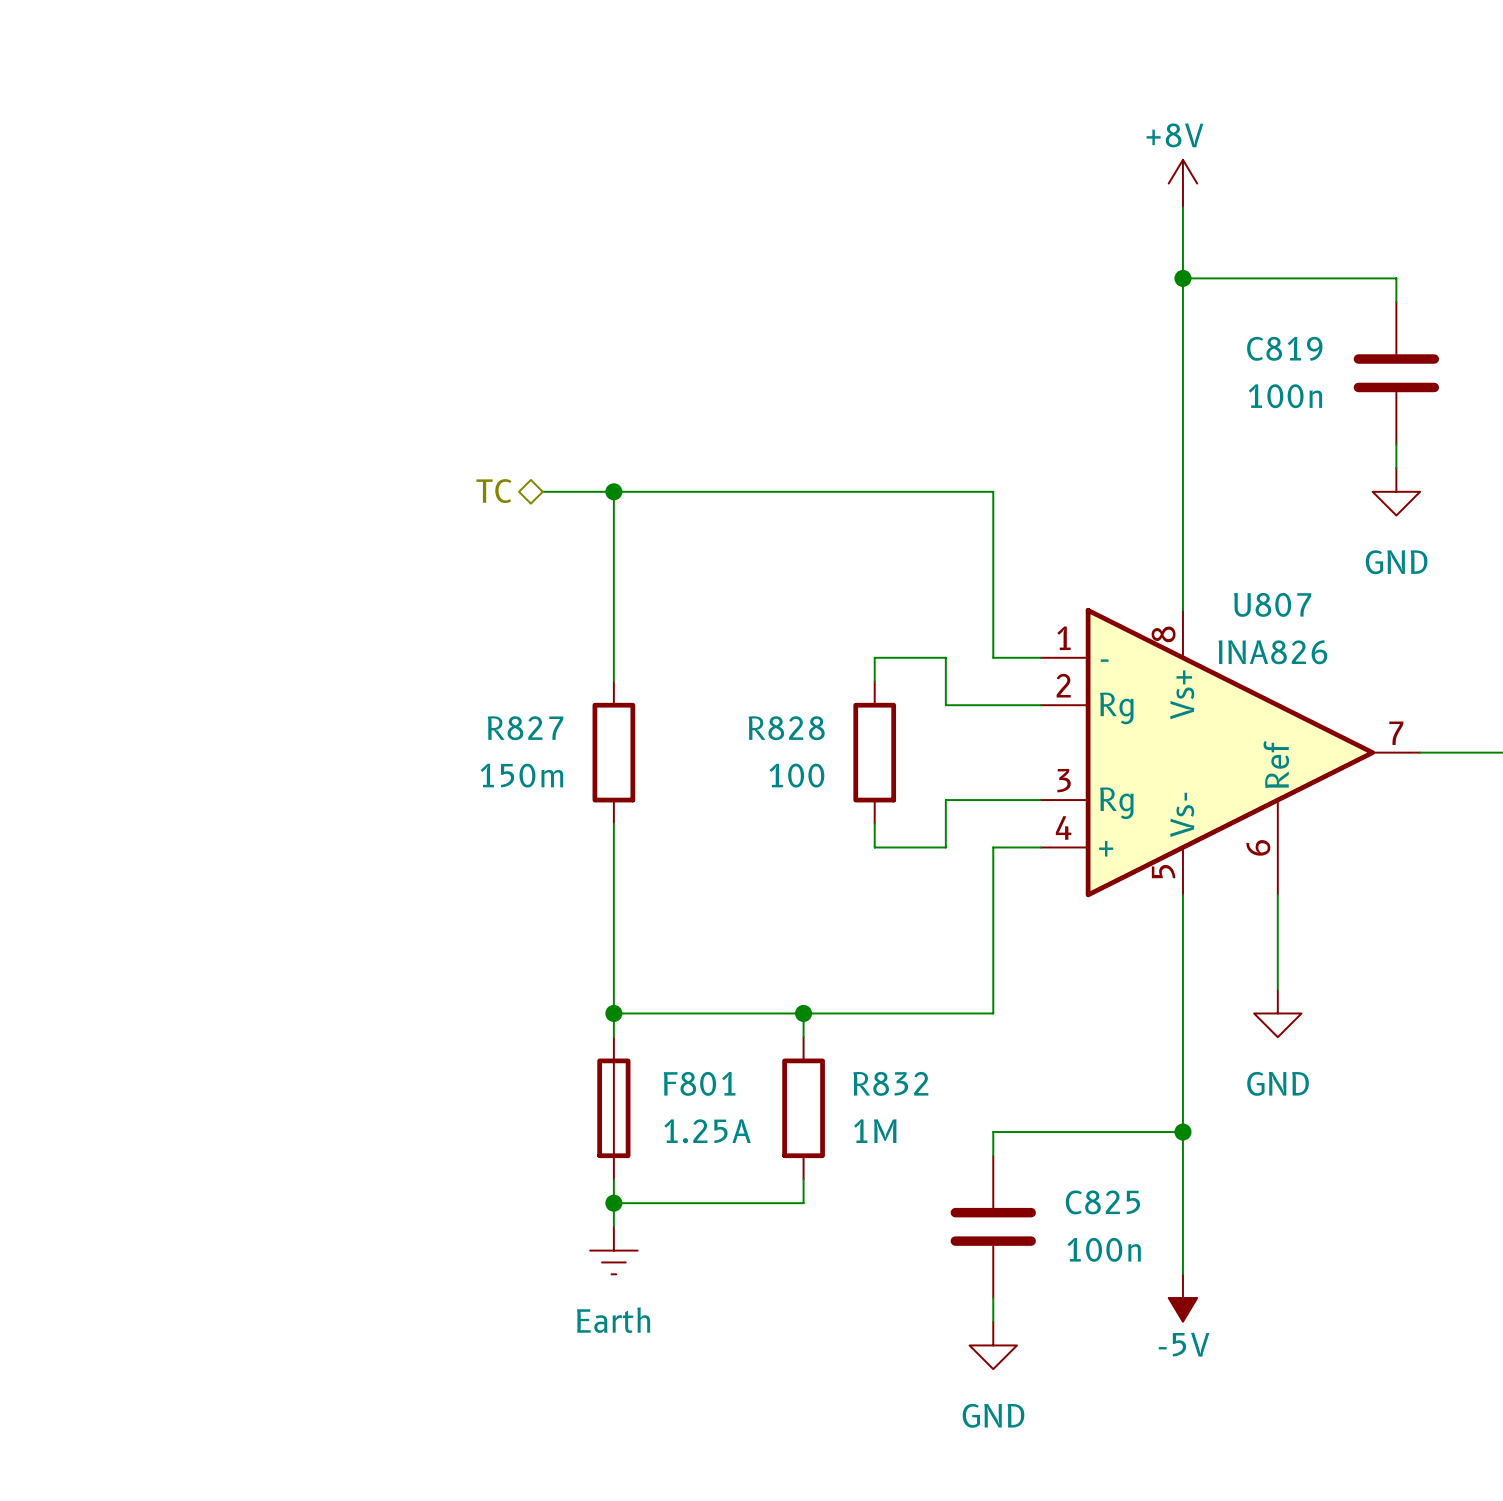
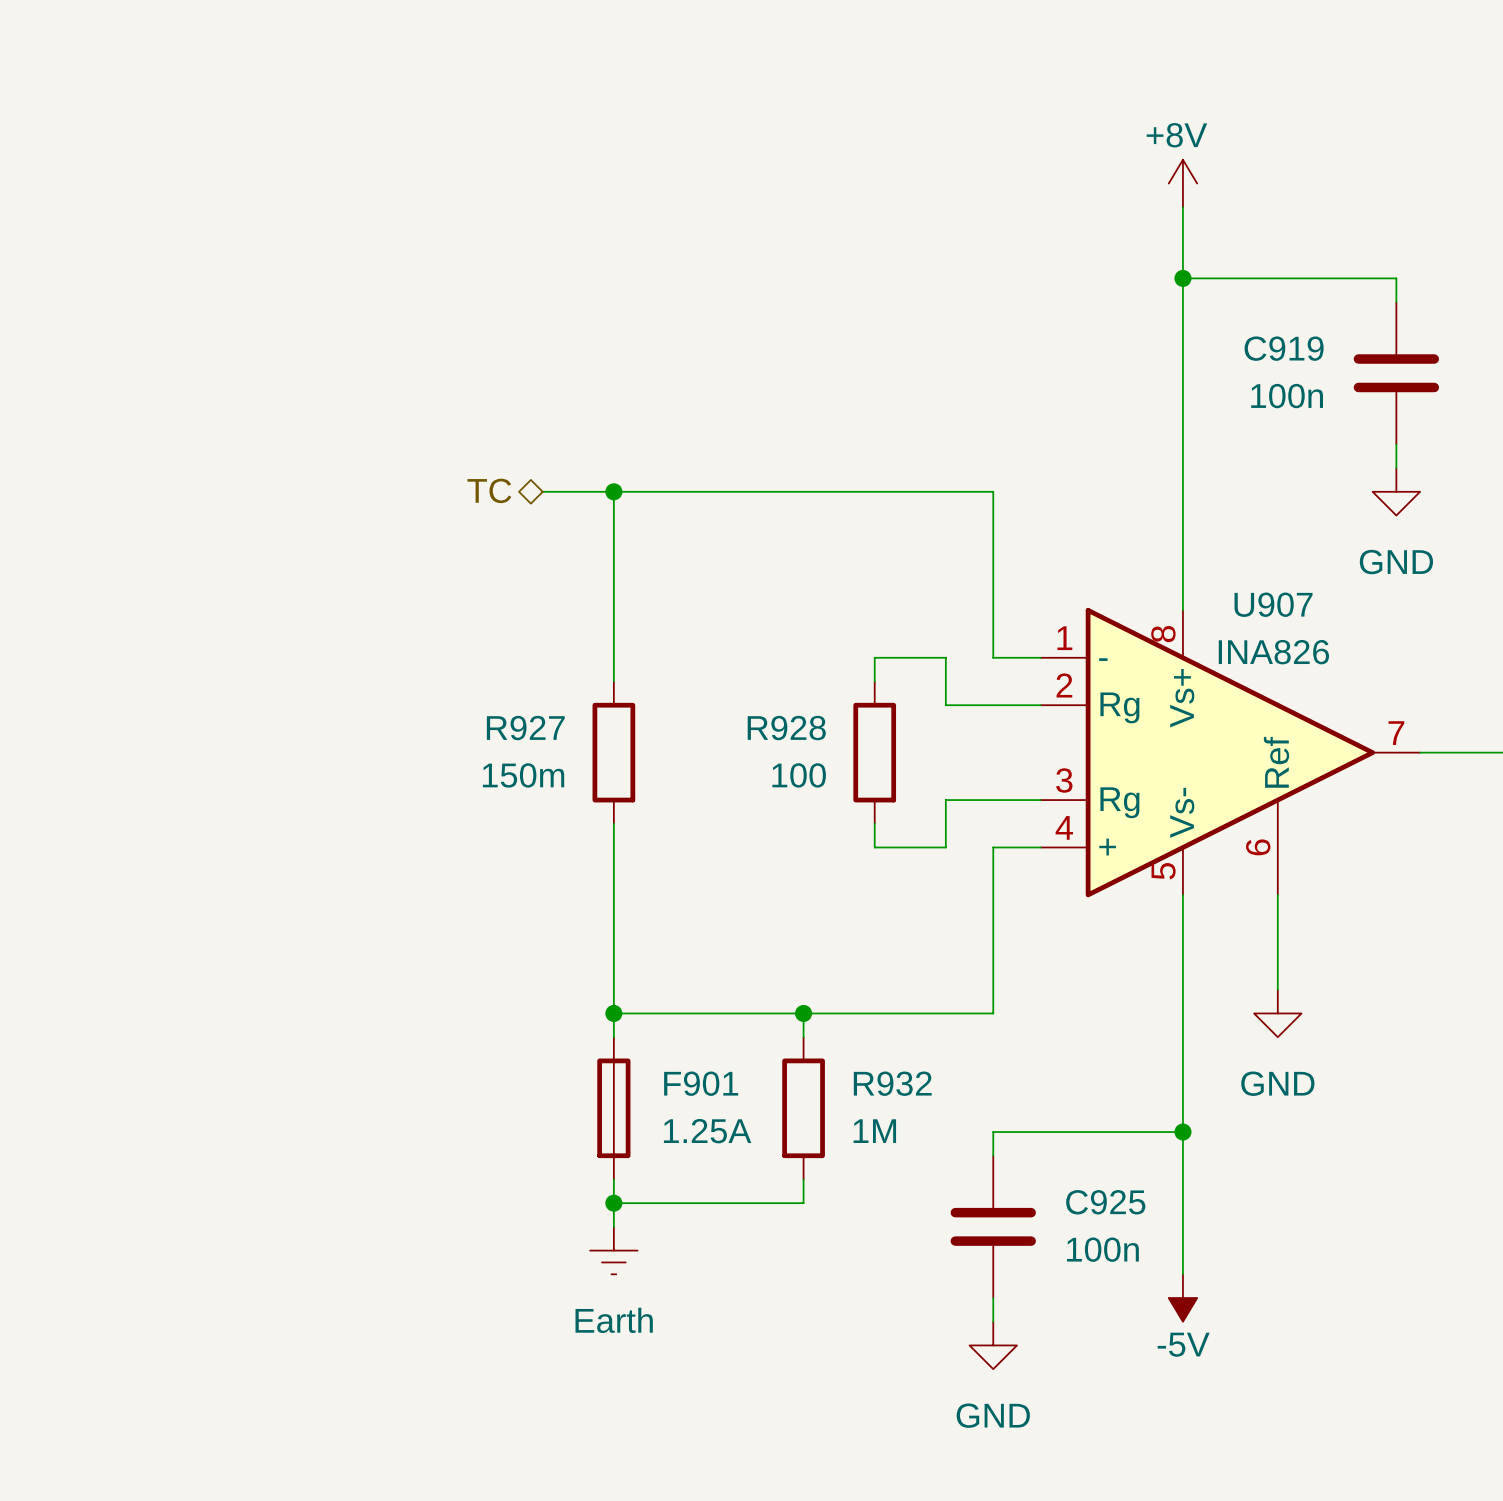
C819 name: C819 (1284, 348) -> C919 (1284, 348)
U807 name: U807 (1272, 604) -> U907 (1273, 604)
R827 name: R827 (525, 728) -> R927 (525, 728)
R828 name: R828 (786, 728) -> R928 (786, 728)
F801 name: F801 (699, 1083) -> F901 (701, 1083)
R832 name: R832 (890, 1083) -> R932 (892, 1083)
C825 name: C825 (1102, 1202) -> C925 (1105, 1202)

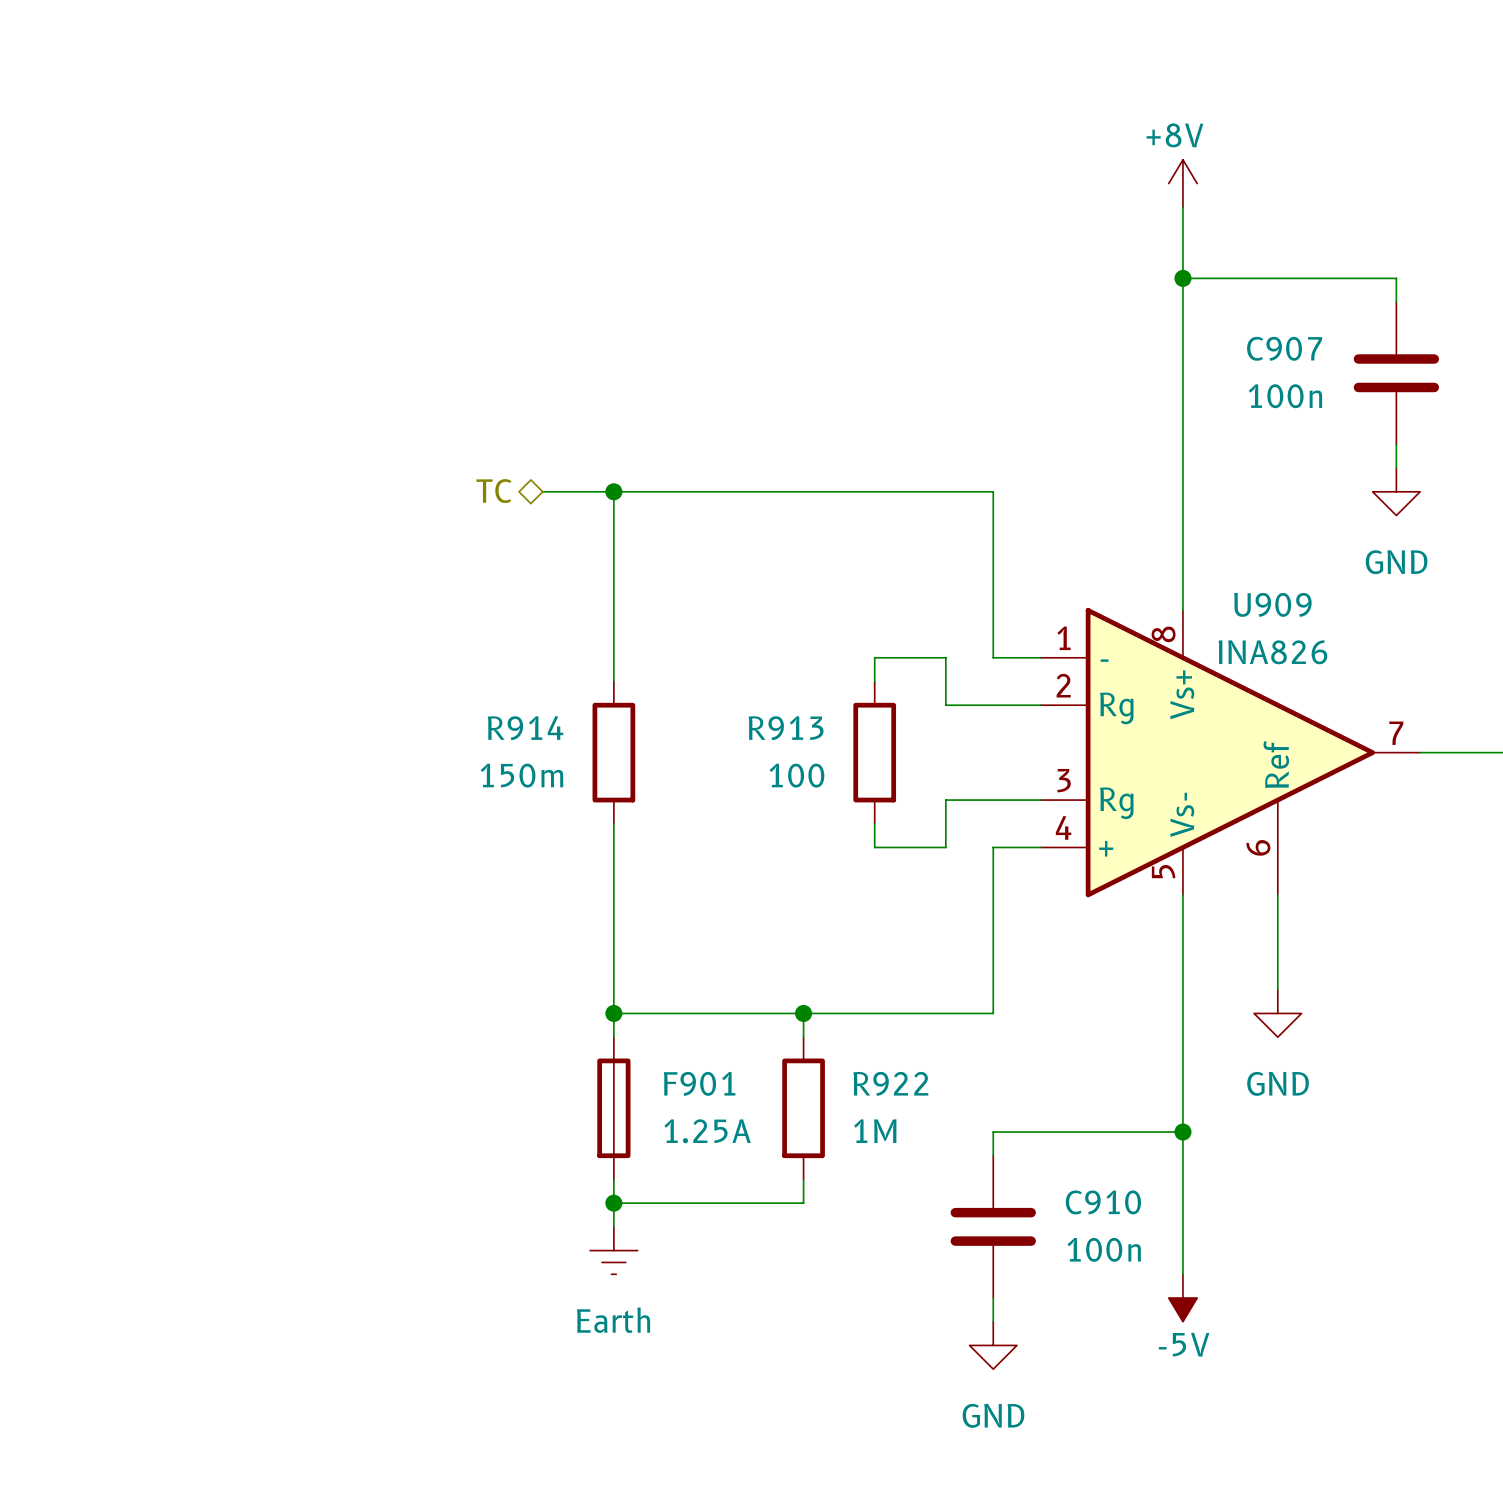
C919 name: C919 (1284, 348) -> C907 (1284, 348)
U907 name: U907 (1273, 604) -> U909 (1272, 604)
R927 name: R927 (525, 728) -> R914 (525, 728)
R928 name: R928 (786, 728) -> R913 (786, 728)
R932 name: R932 (892, 1083) -> R922 (890, 1083)
C925 name: C925 (1105, 1202) -> C910 (1103, 1202)

